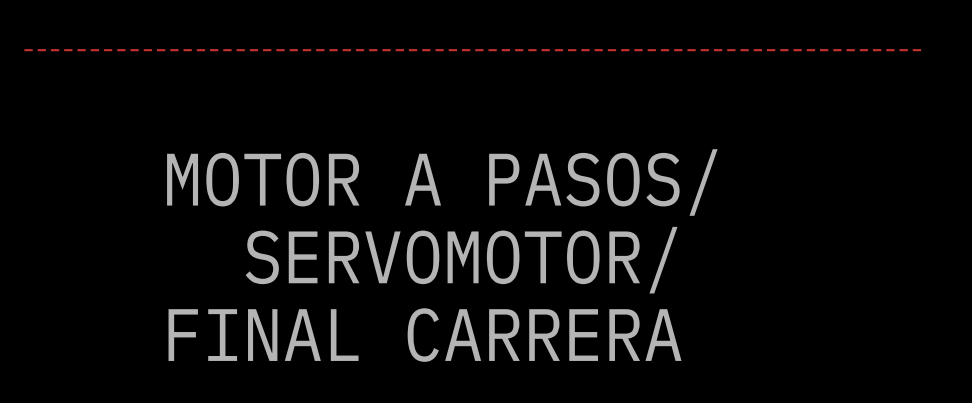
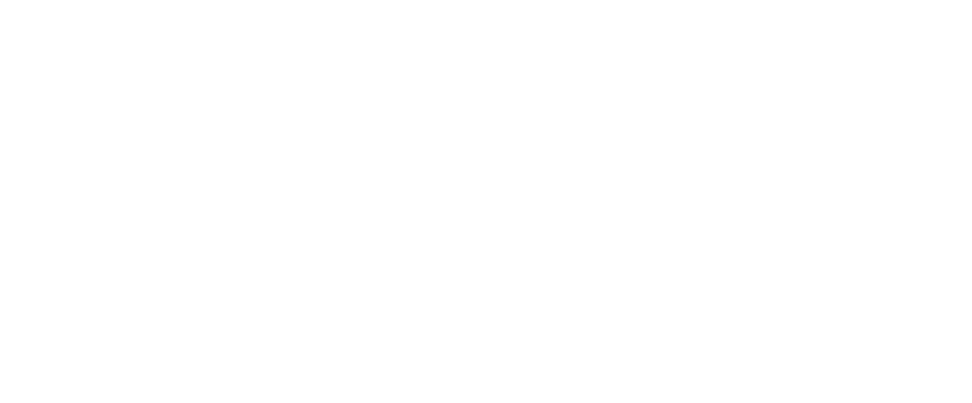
line: (24, 50) (922, 50) -> none
text: MOTOR A PASOS/ (442, 182) -> none
text: SERVOMOTOR/ (461, 260) -> none
text: FINAL CARRERA (425, 335) -> none

